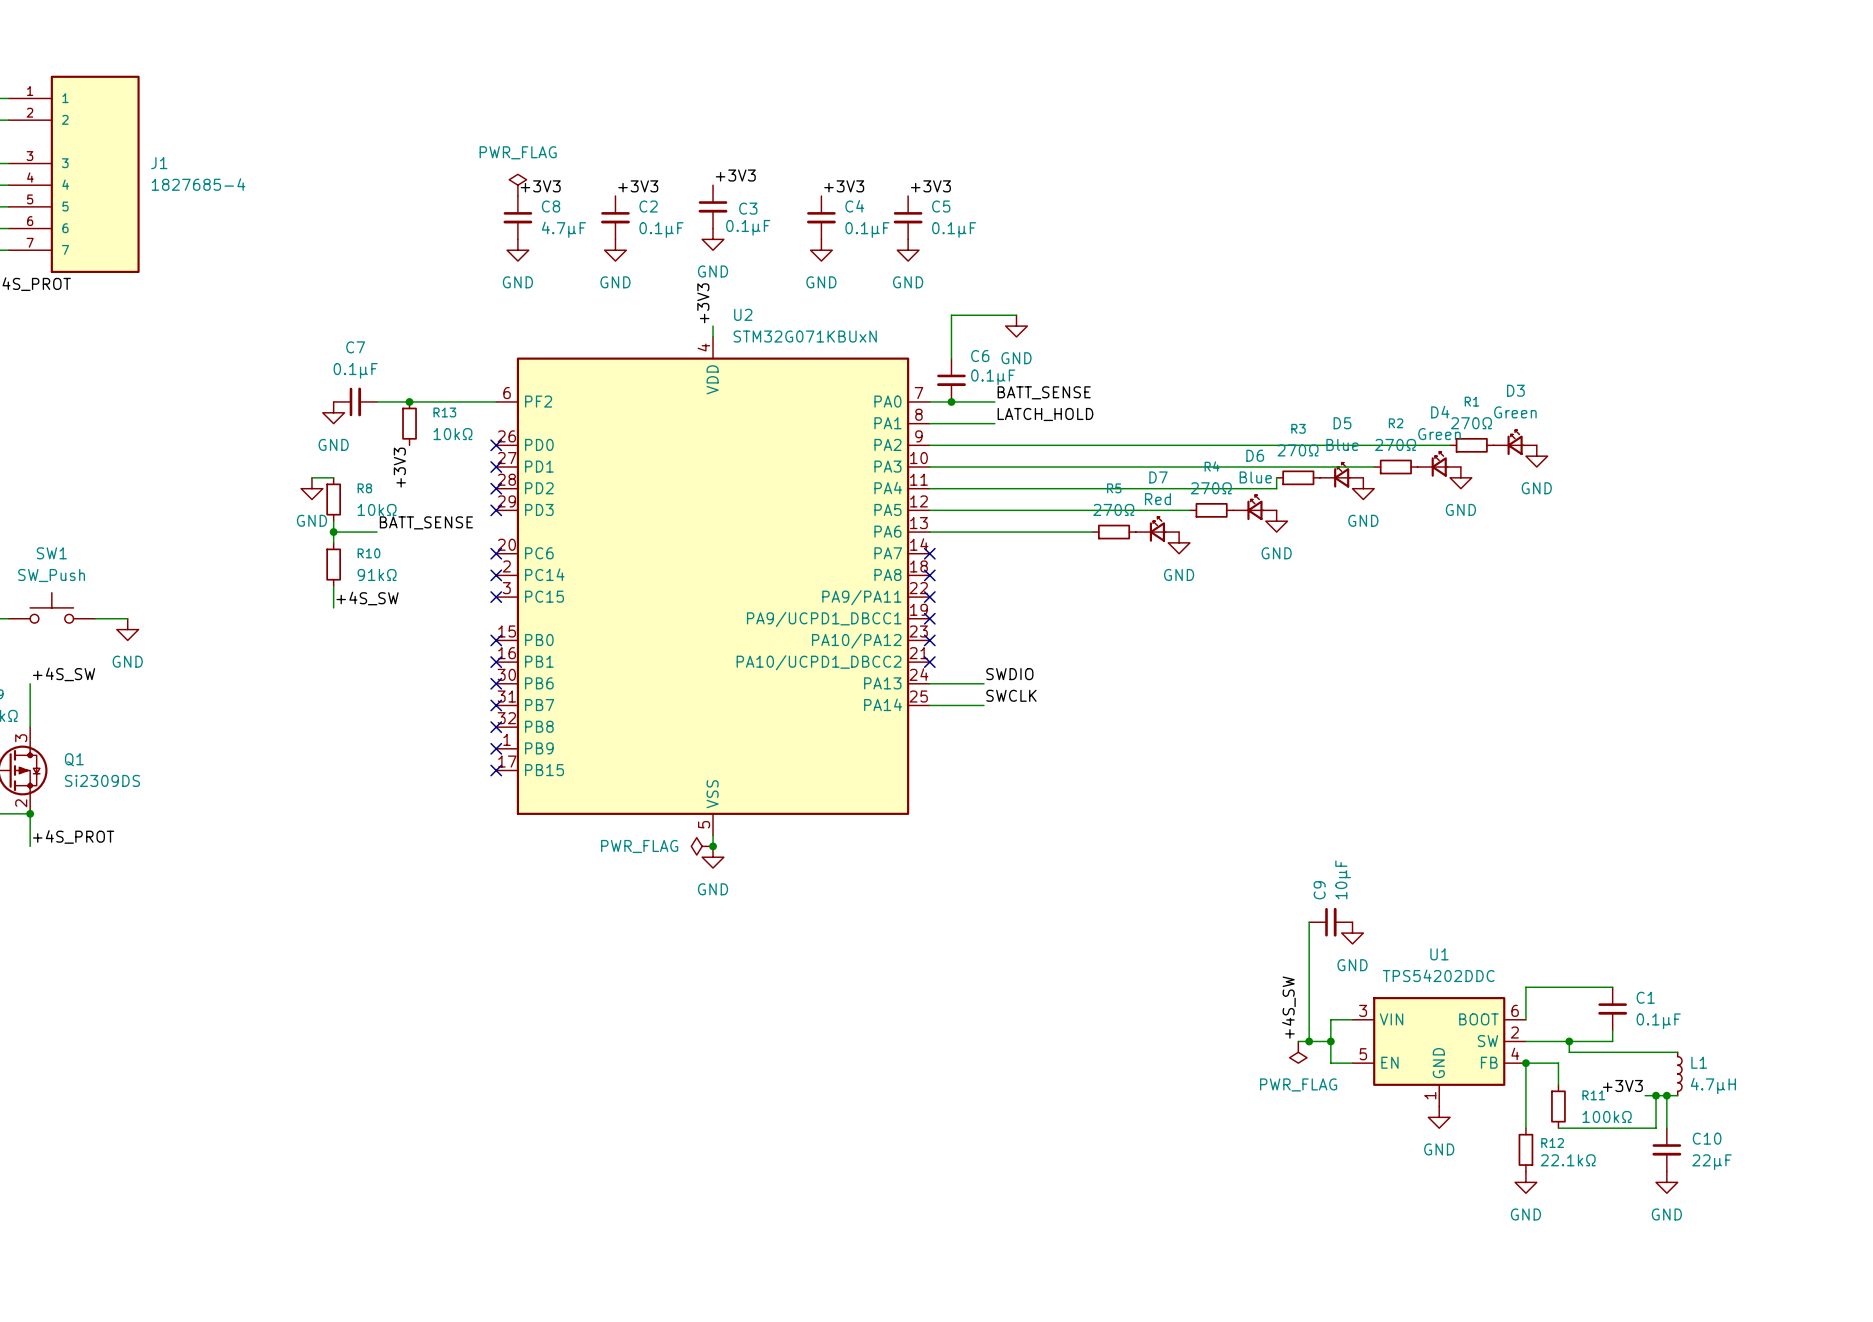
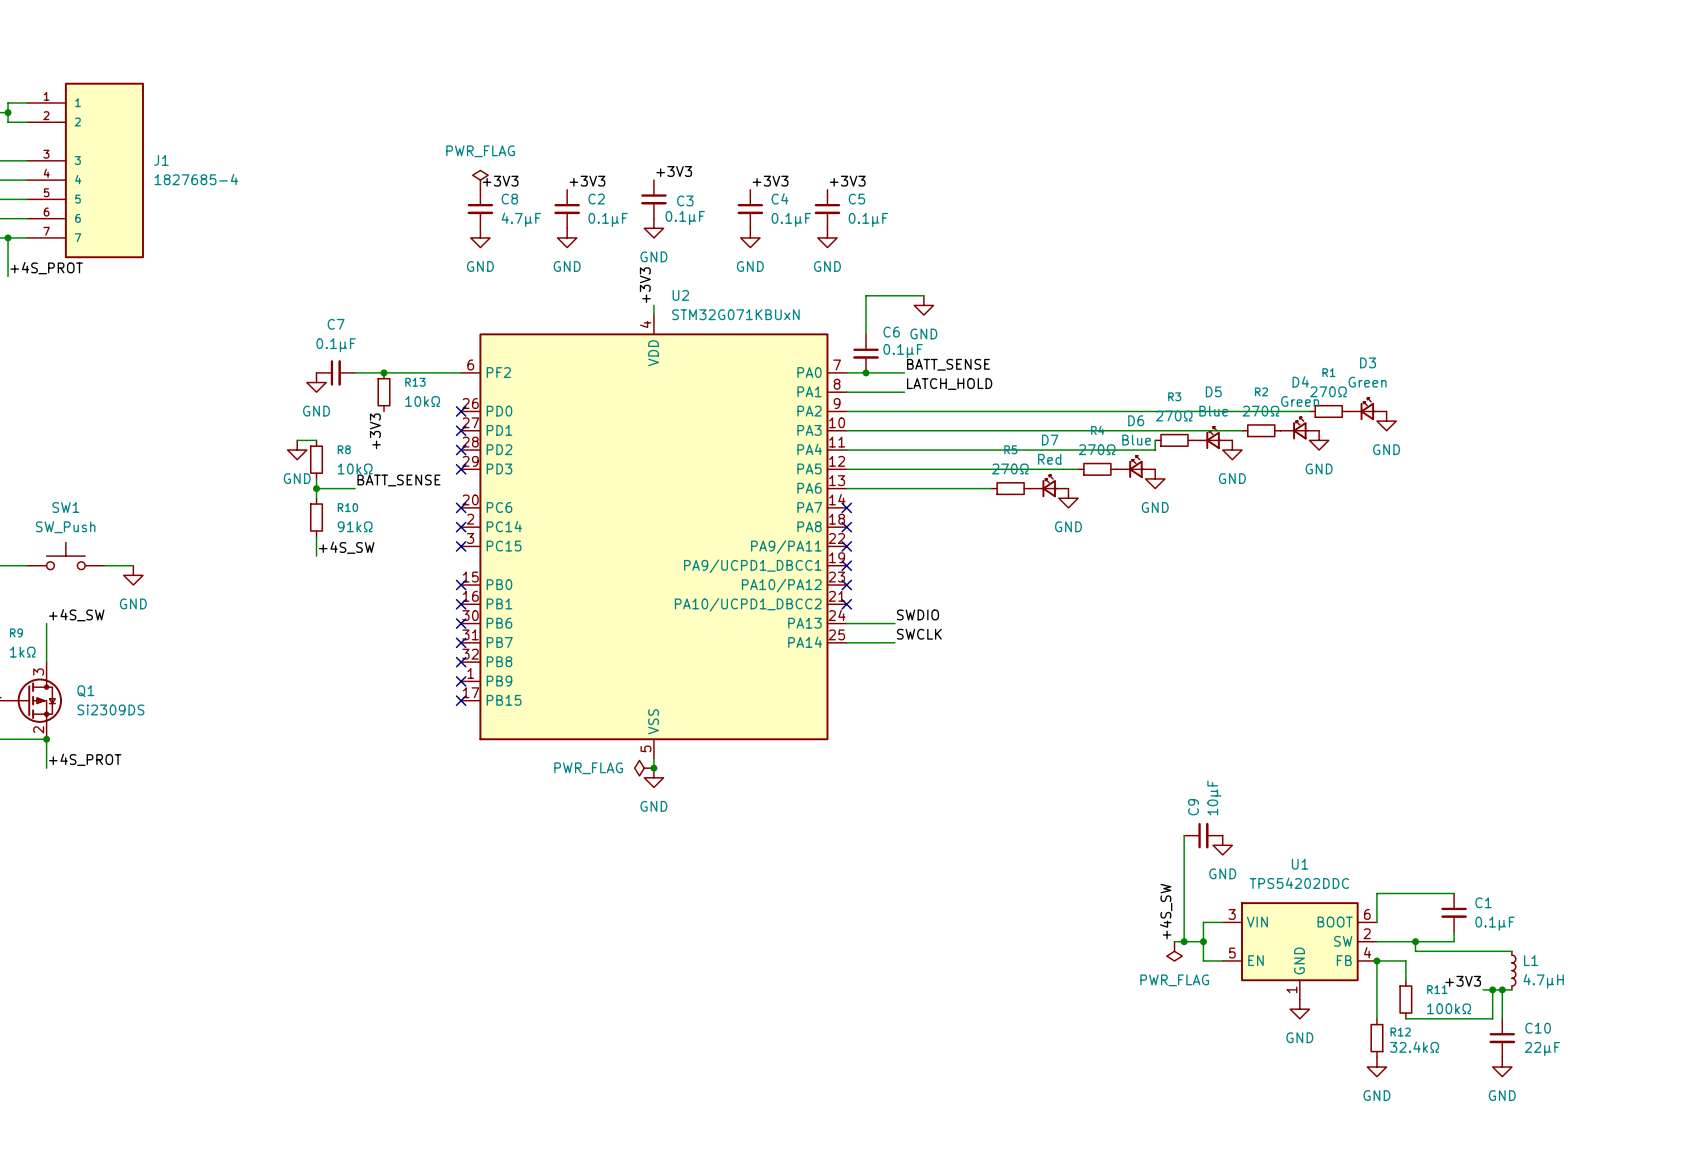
R12 value: 22.1kΩ (1568, 1160) -> 32.4kΩ (1414, 1047)

